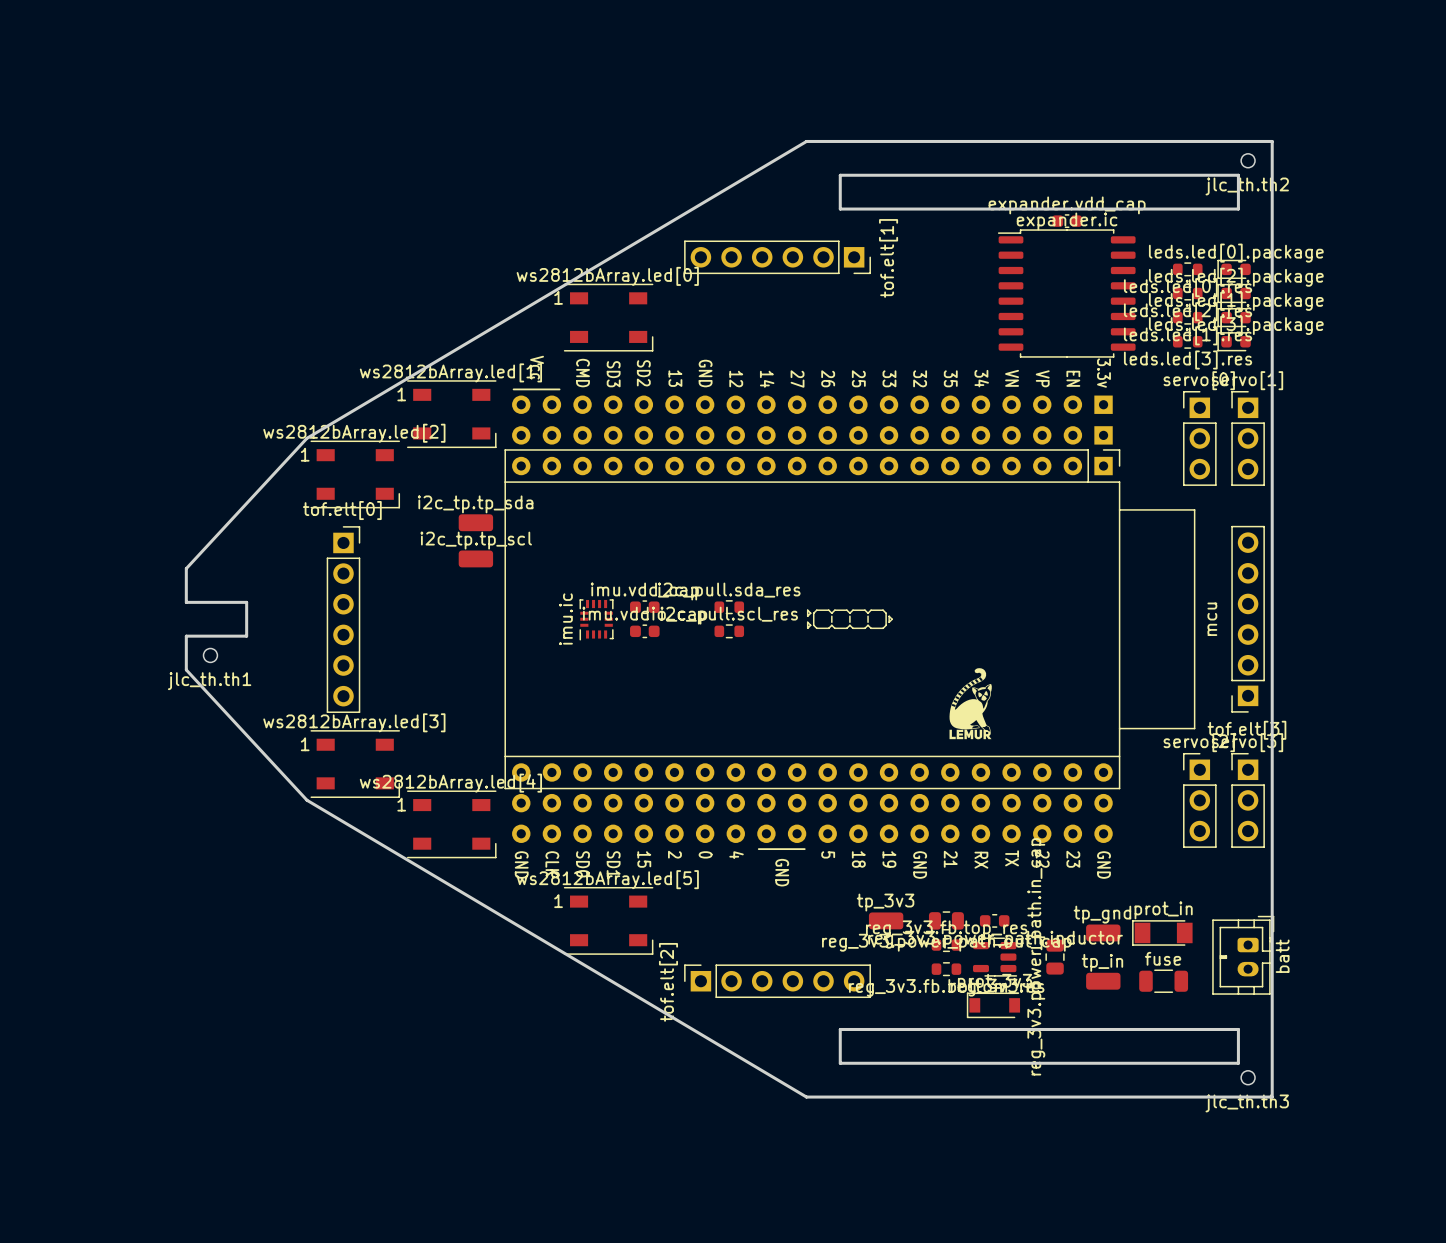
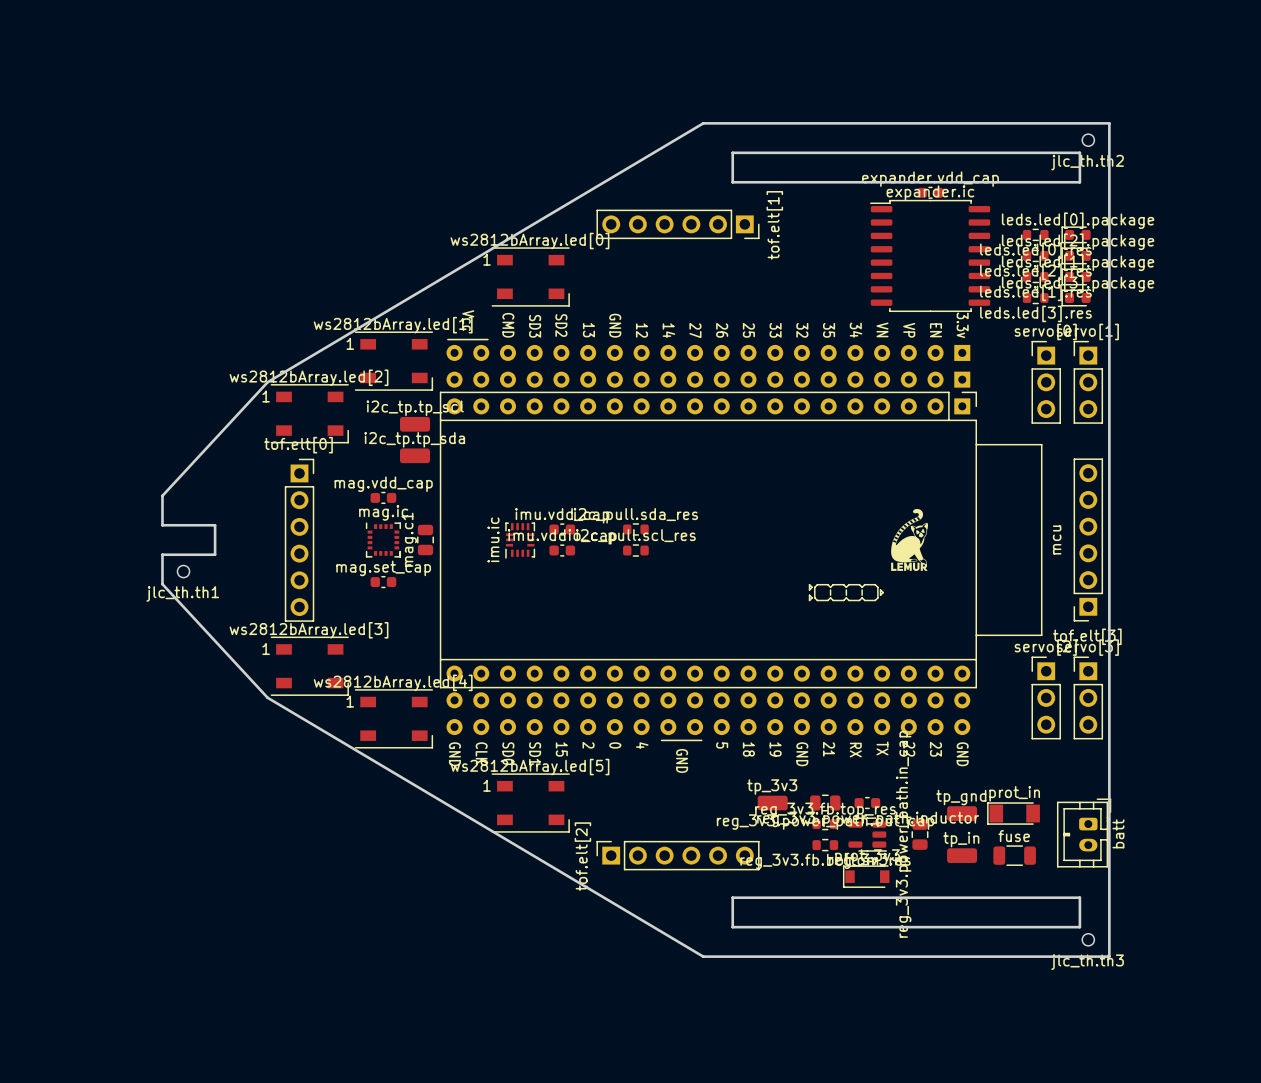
i2c_tp.tp_scl position: (475, 558) -> (414, 424)
mag.vdd_cap: none -> (383, 497)
mag.ic: none -> (383, 539)
mag.c1: none -> (425, 539)
drawing position: (849, 619) -> (846, 592)
mag.set_cap: none -> (383, 582)
drawing position: (970, 703) -> (909, 539)

